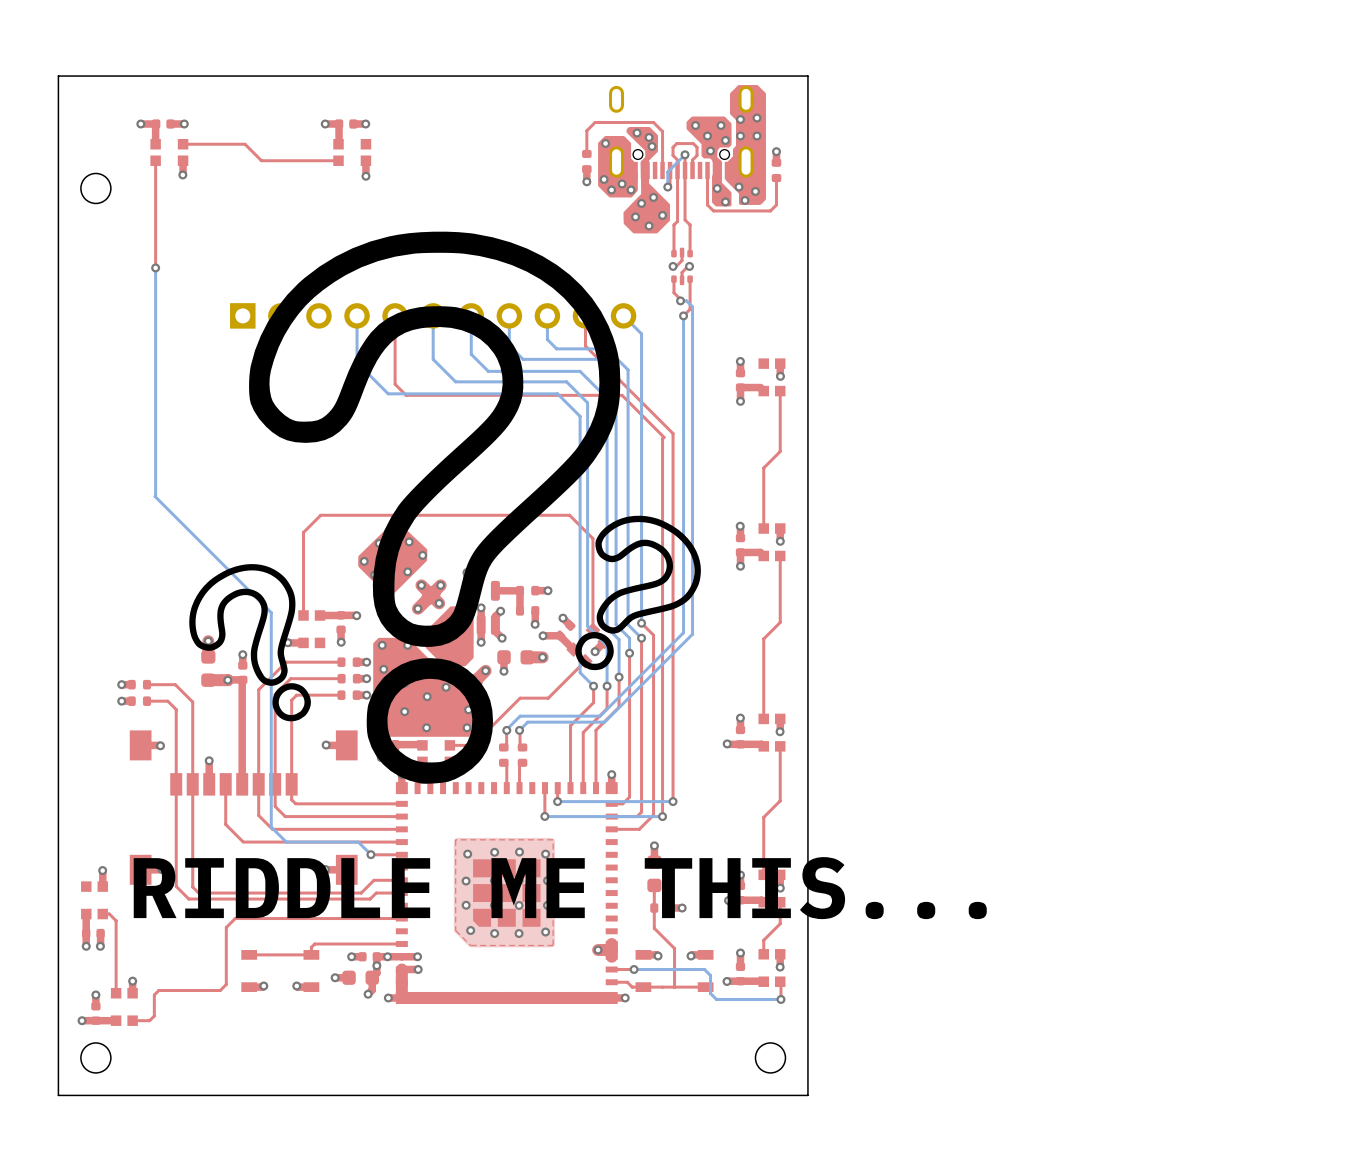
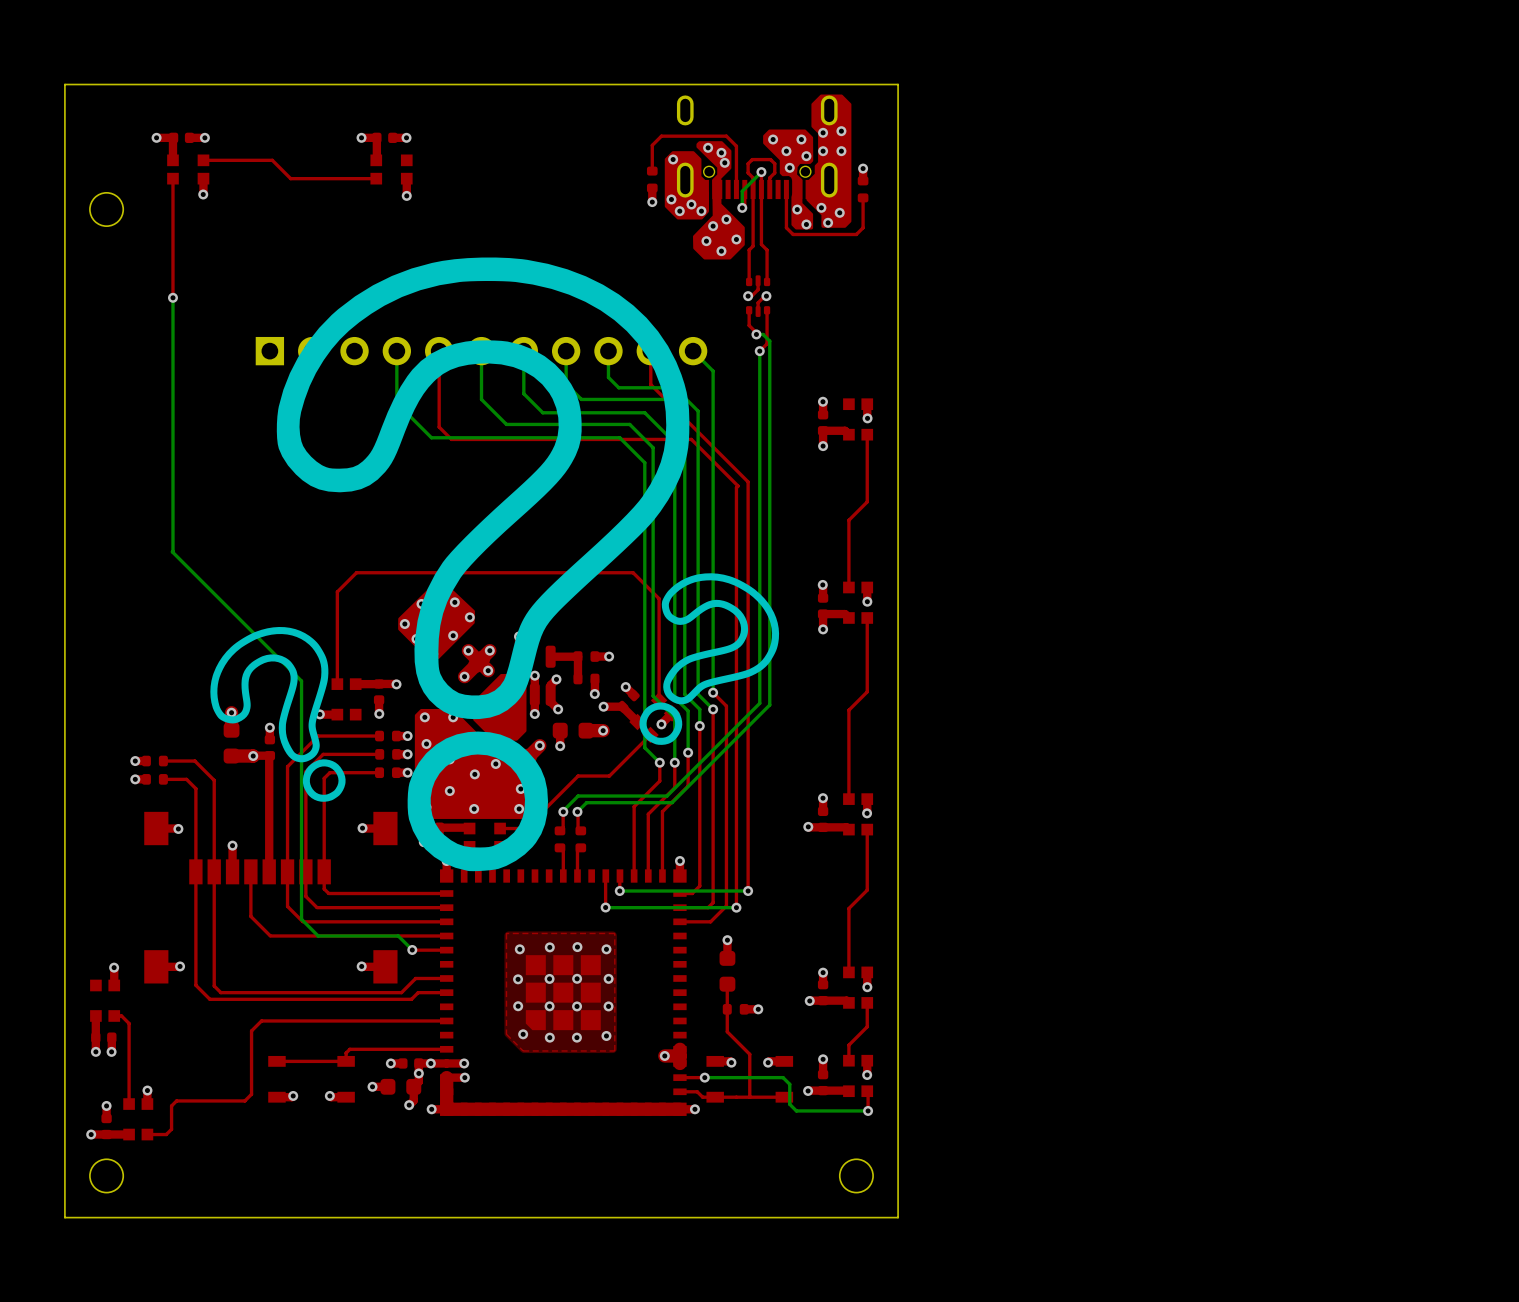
text: RIDDLE ME THIS... (560, 888) -> none

